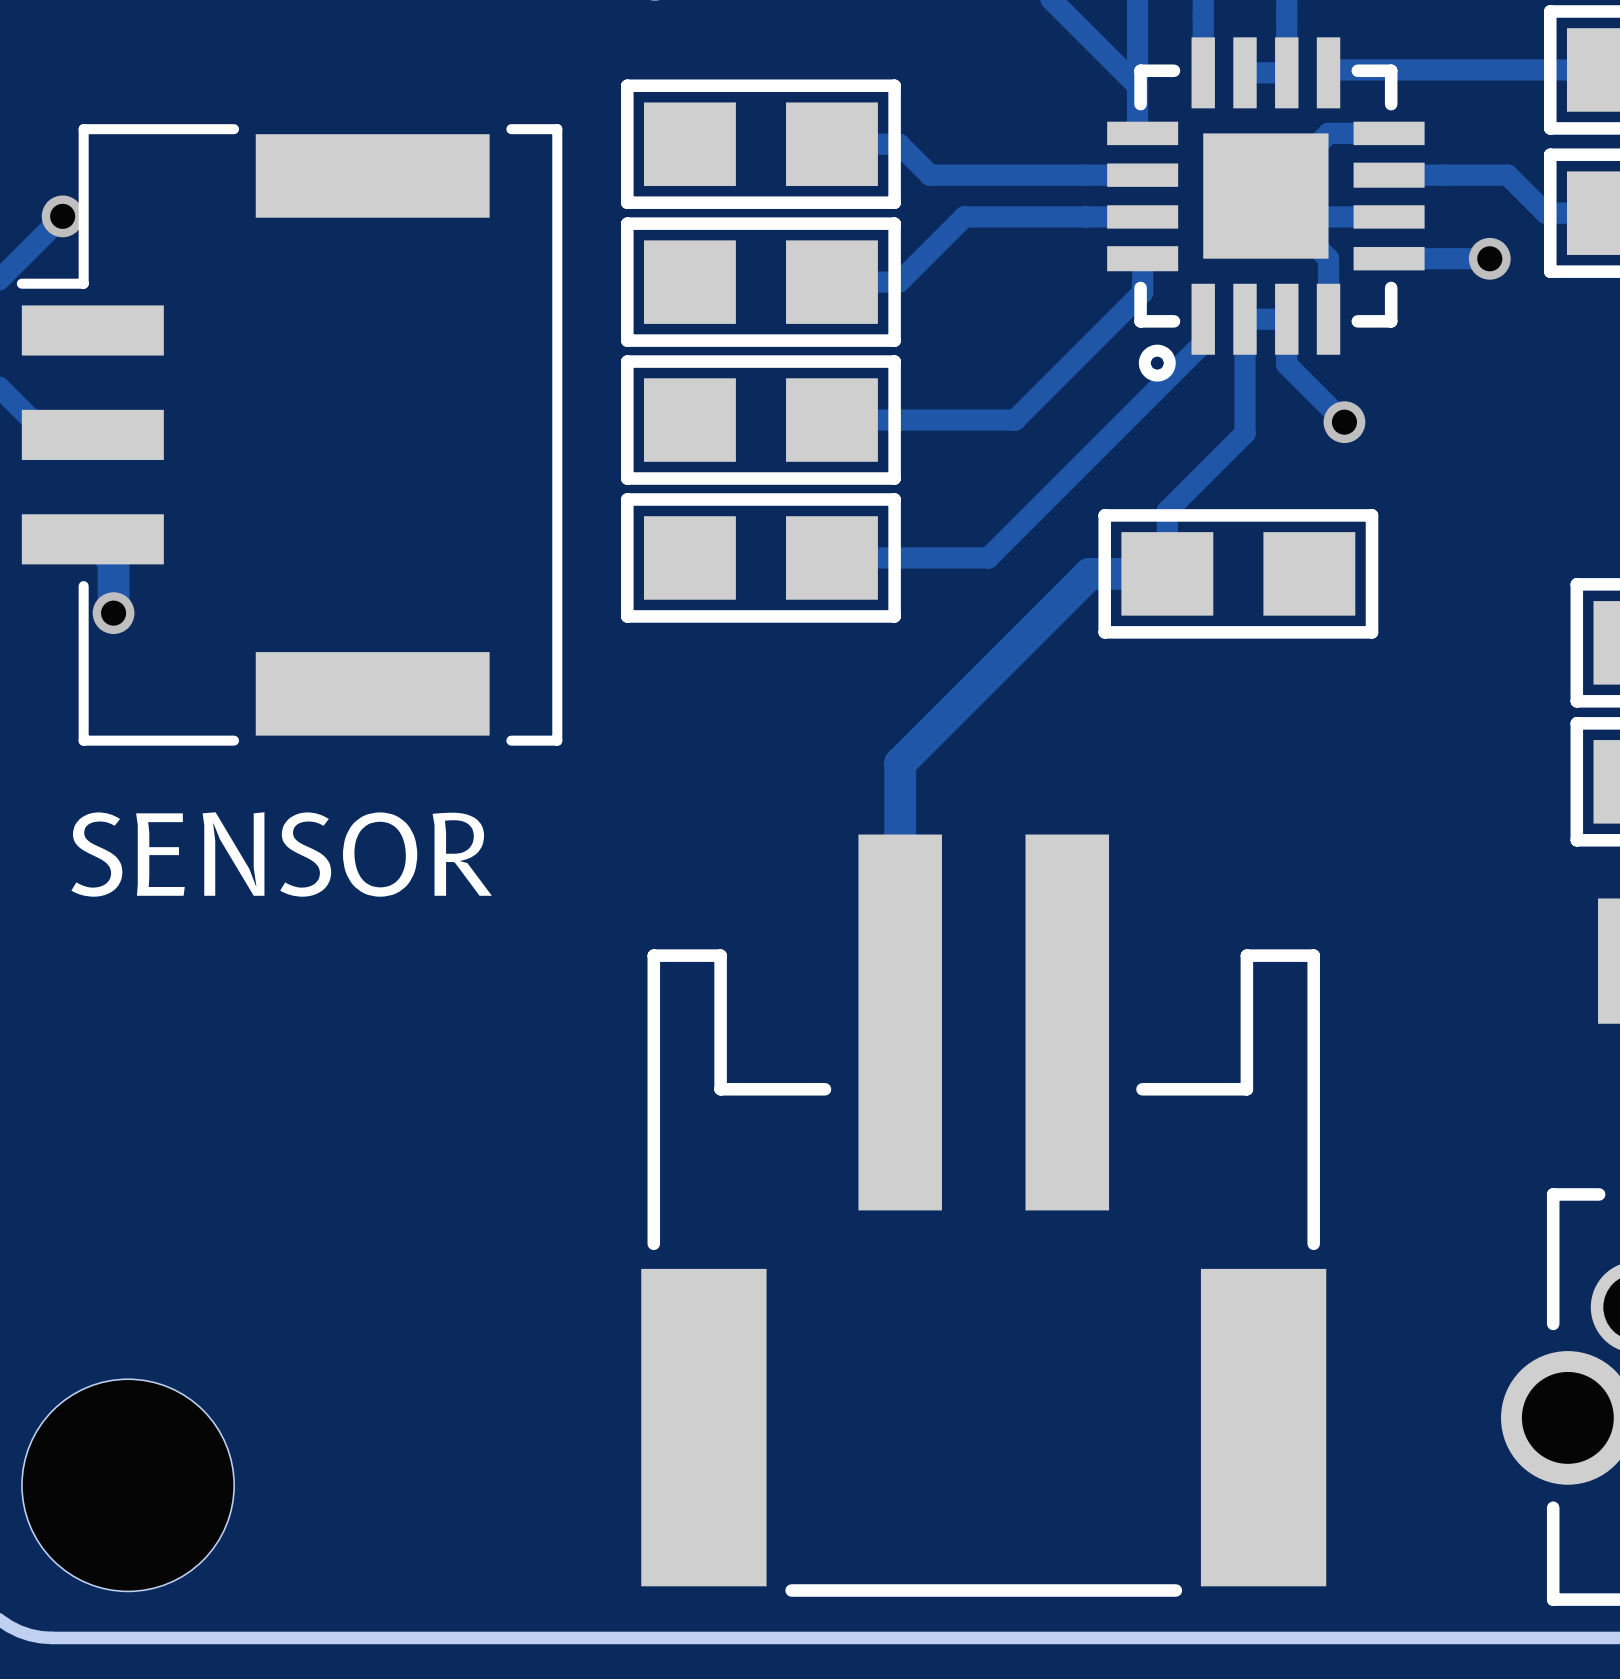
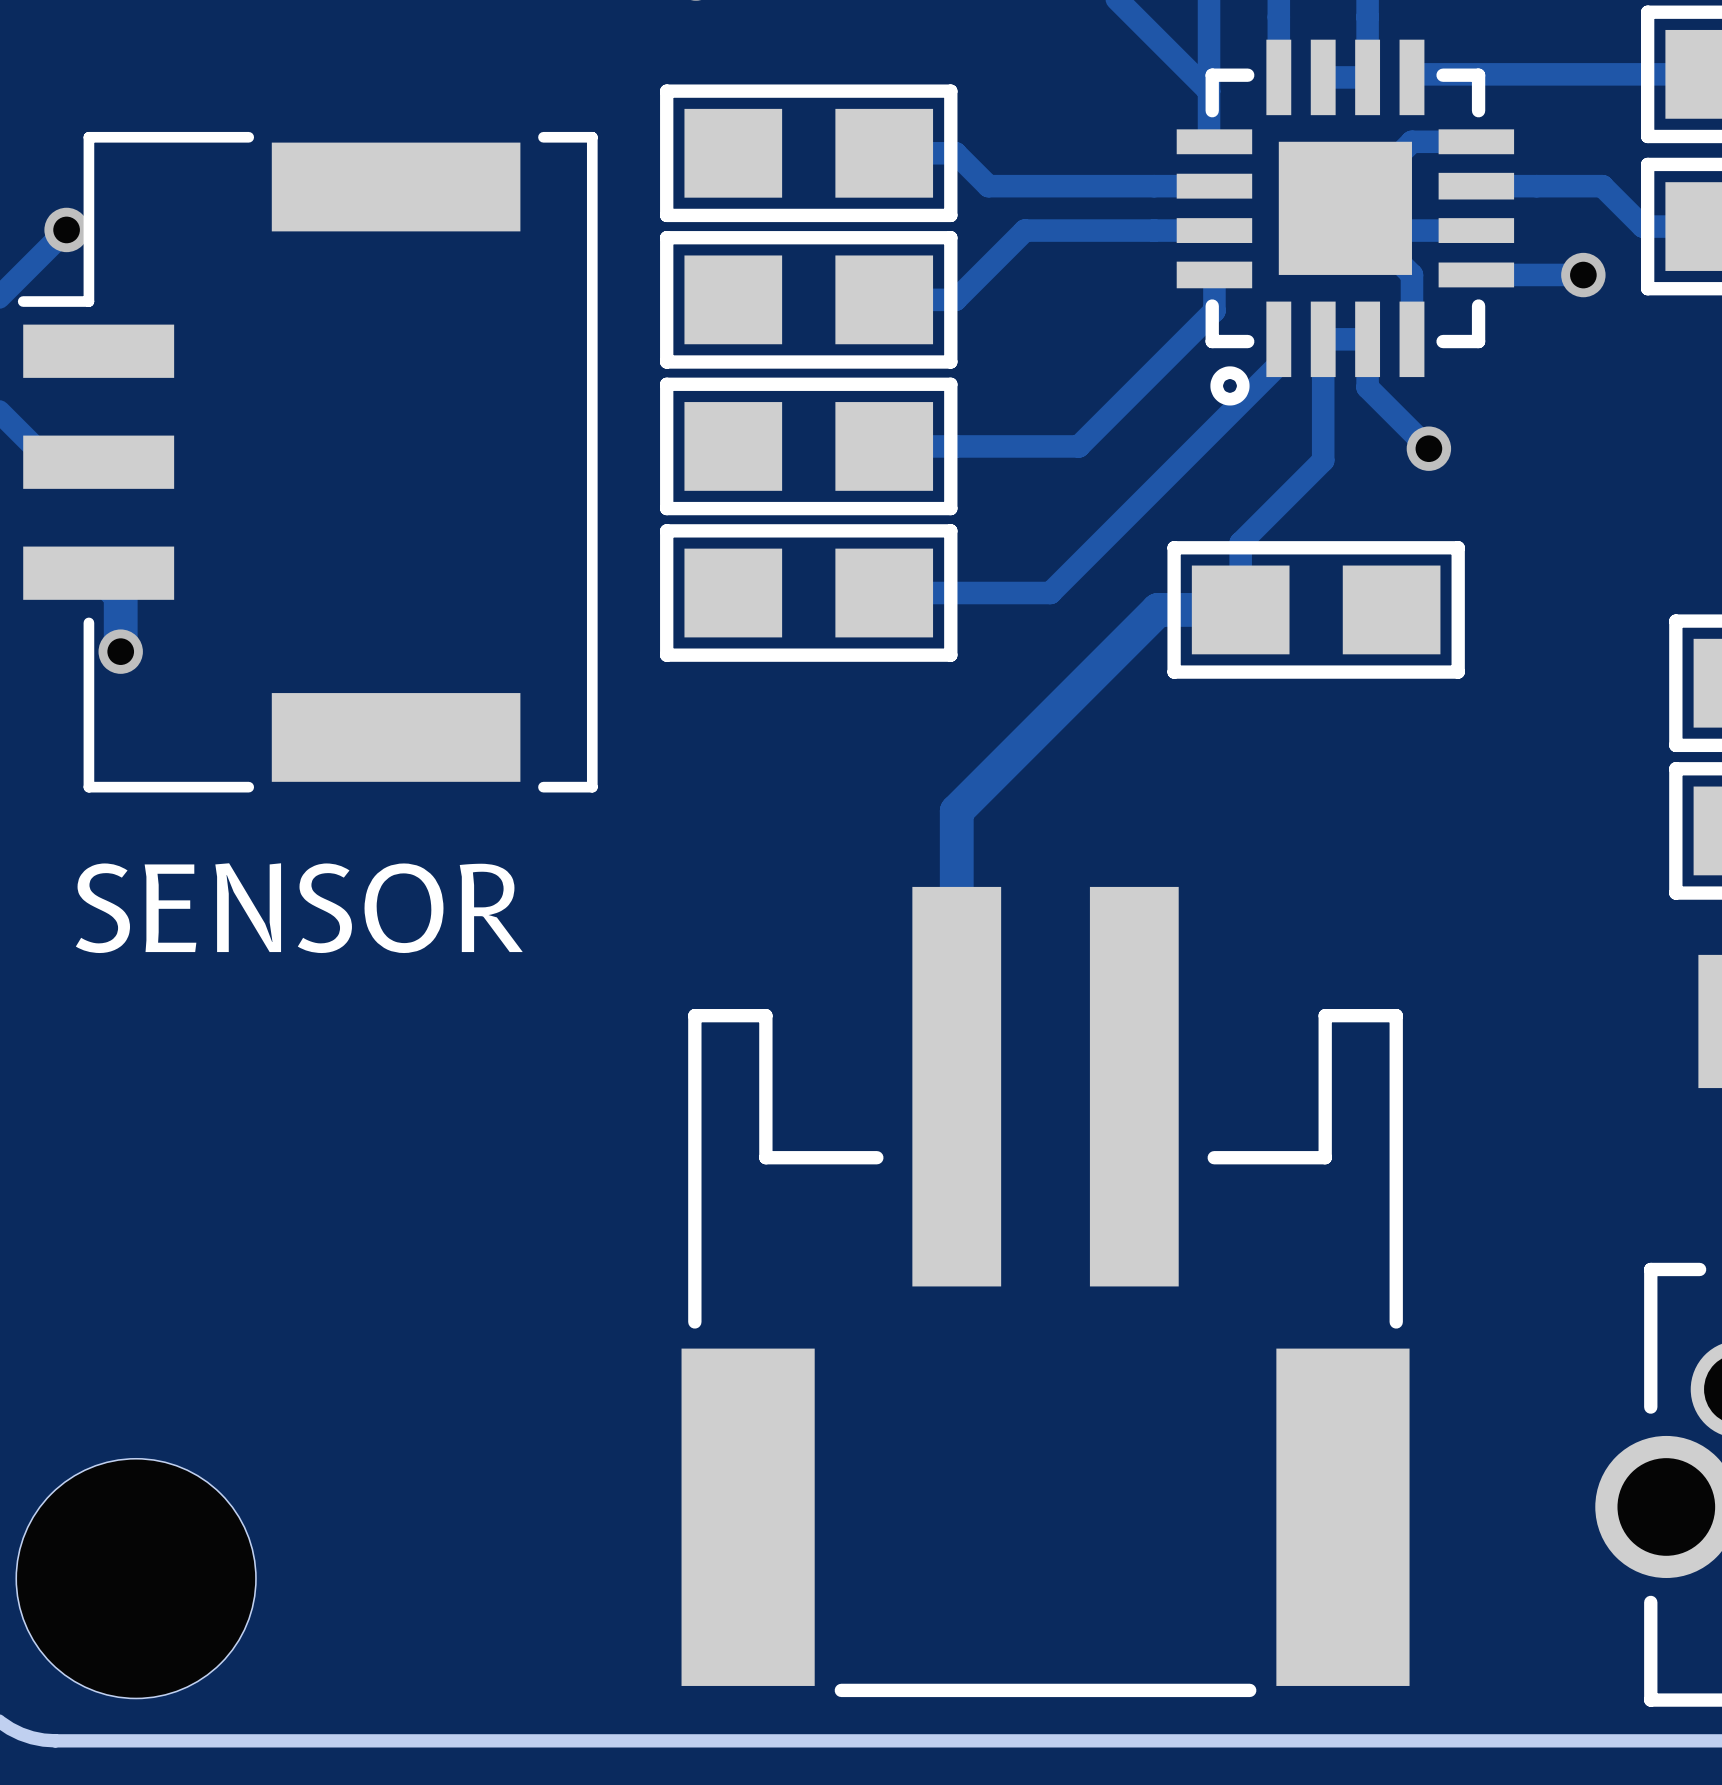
part footprint: [21, 1379, 235, 1592] -> [16, 1458, 256, 1699]

